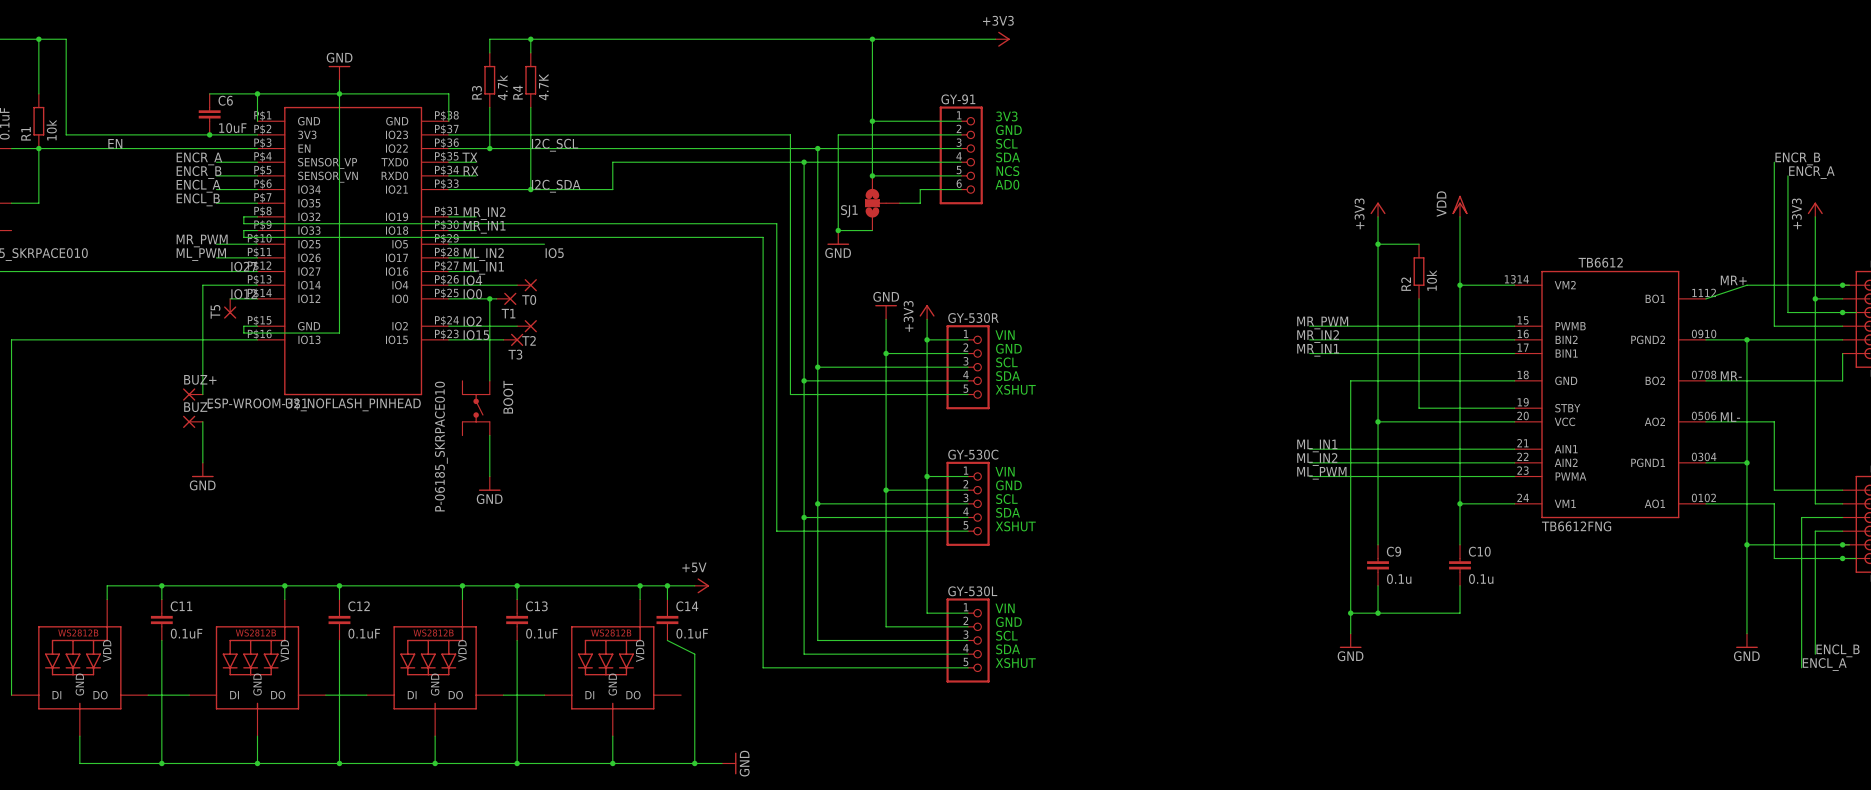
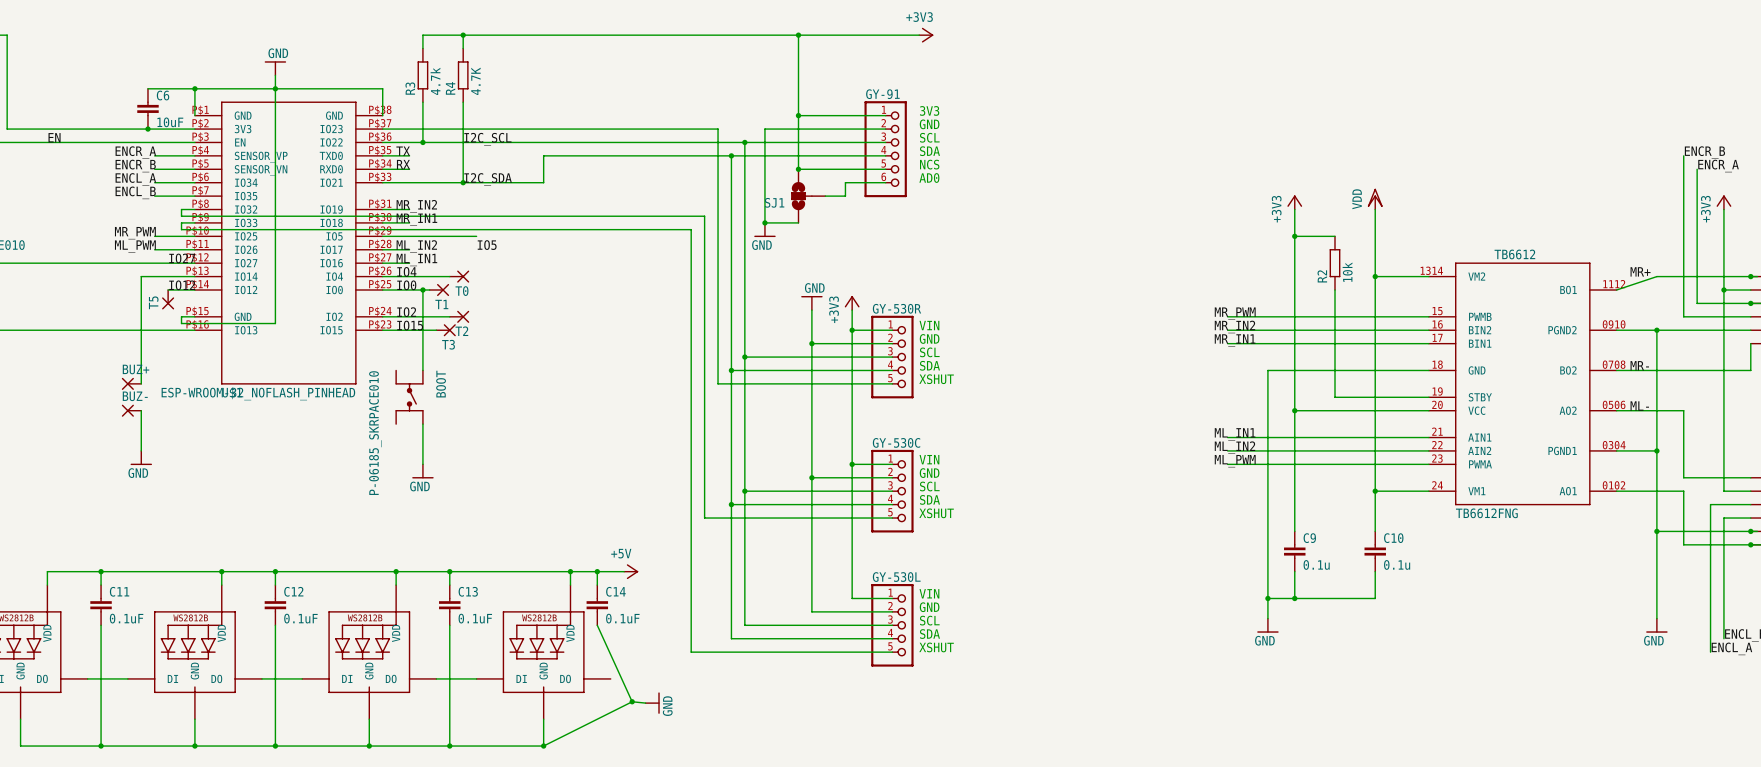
wire: (667, 640) (694, 654) (694, 763) -> (597, 625) (632, 701)
wire: none -> (632, 701) (645, 703)
junction: none -> (632, 701)
wire: (612, 763) (722, 763) -> (543, 746) (632, 701)
junction: (694, 763) -> none
power symbol position: GND (729, 763) -> GND (652, 703)

